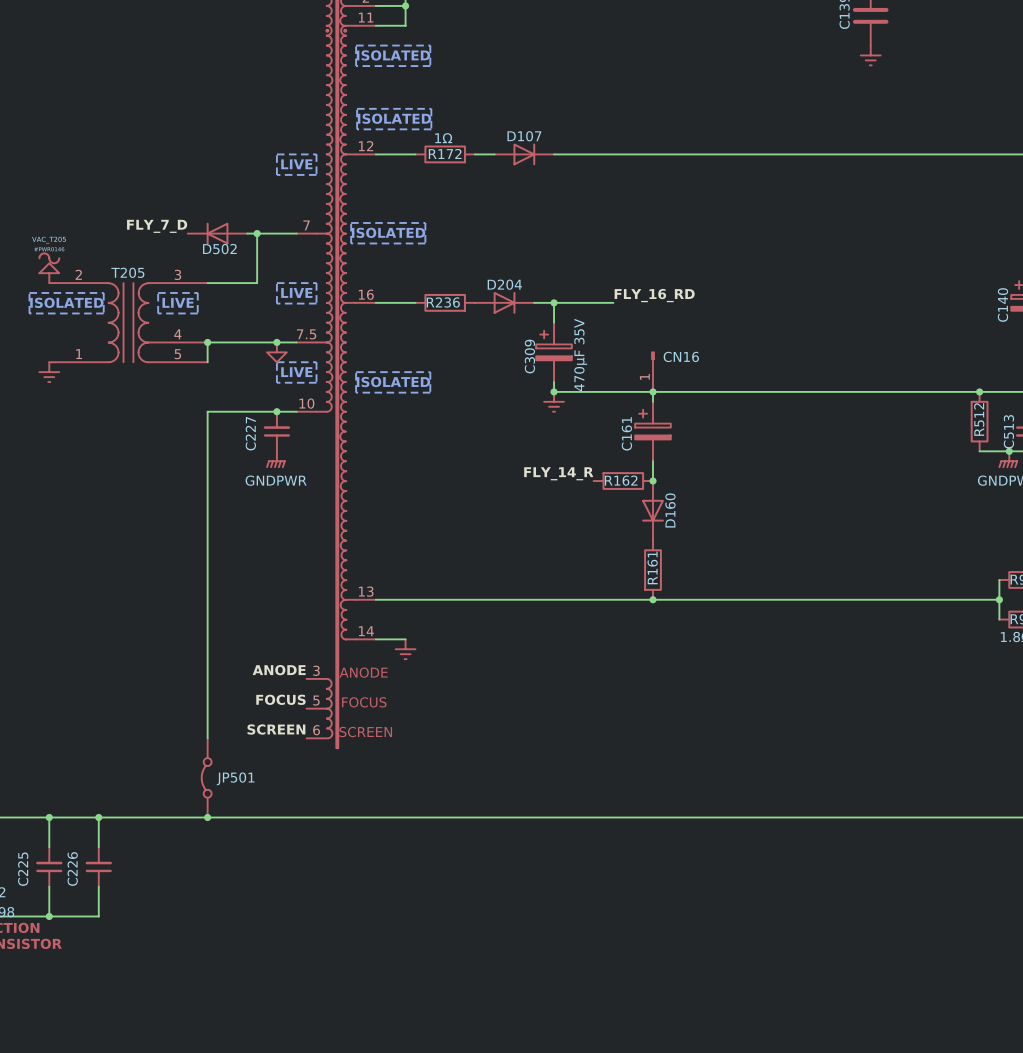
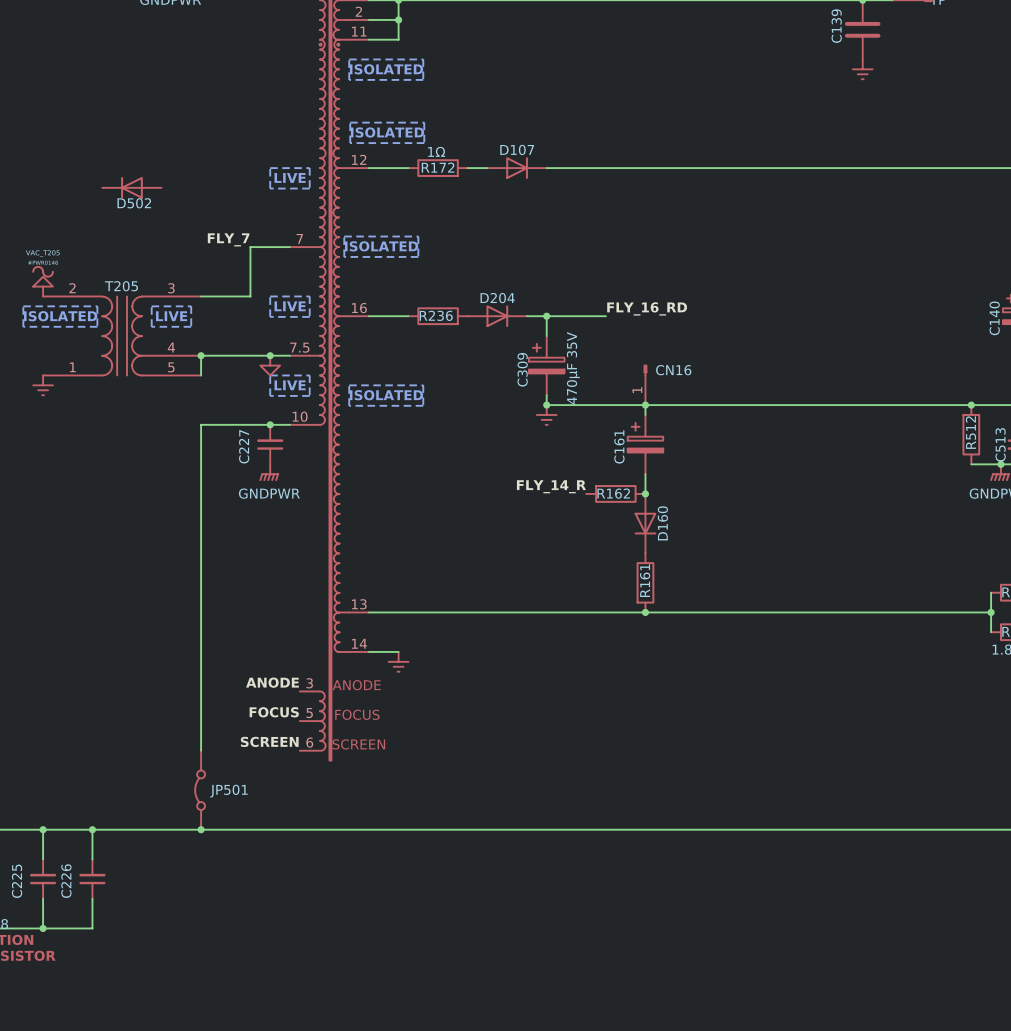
label: FLY_7_D (157, 226) -> none
label: none -> FLY_7 (228, 239)
D502 position: (217, 233) -> (131, 187)
wire: (247, 233) (257, 233) -> none
junction: (257, 233) -> none

